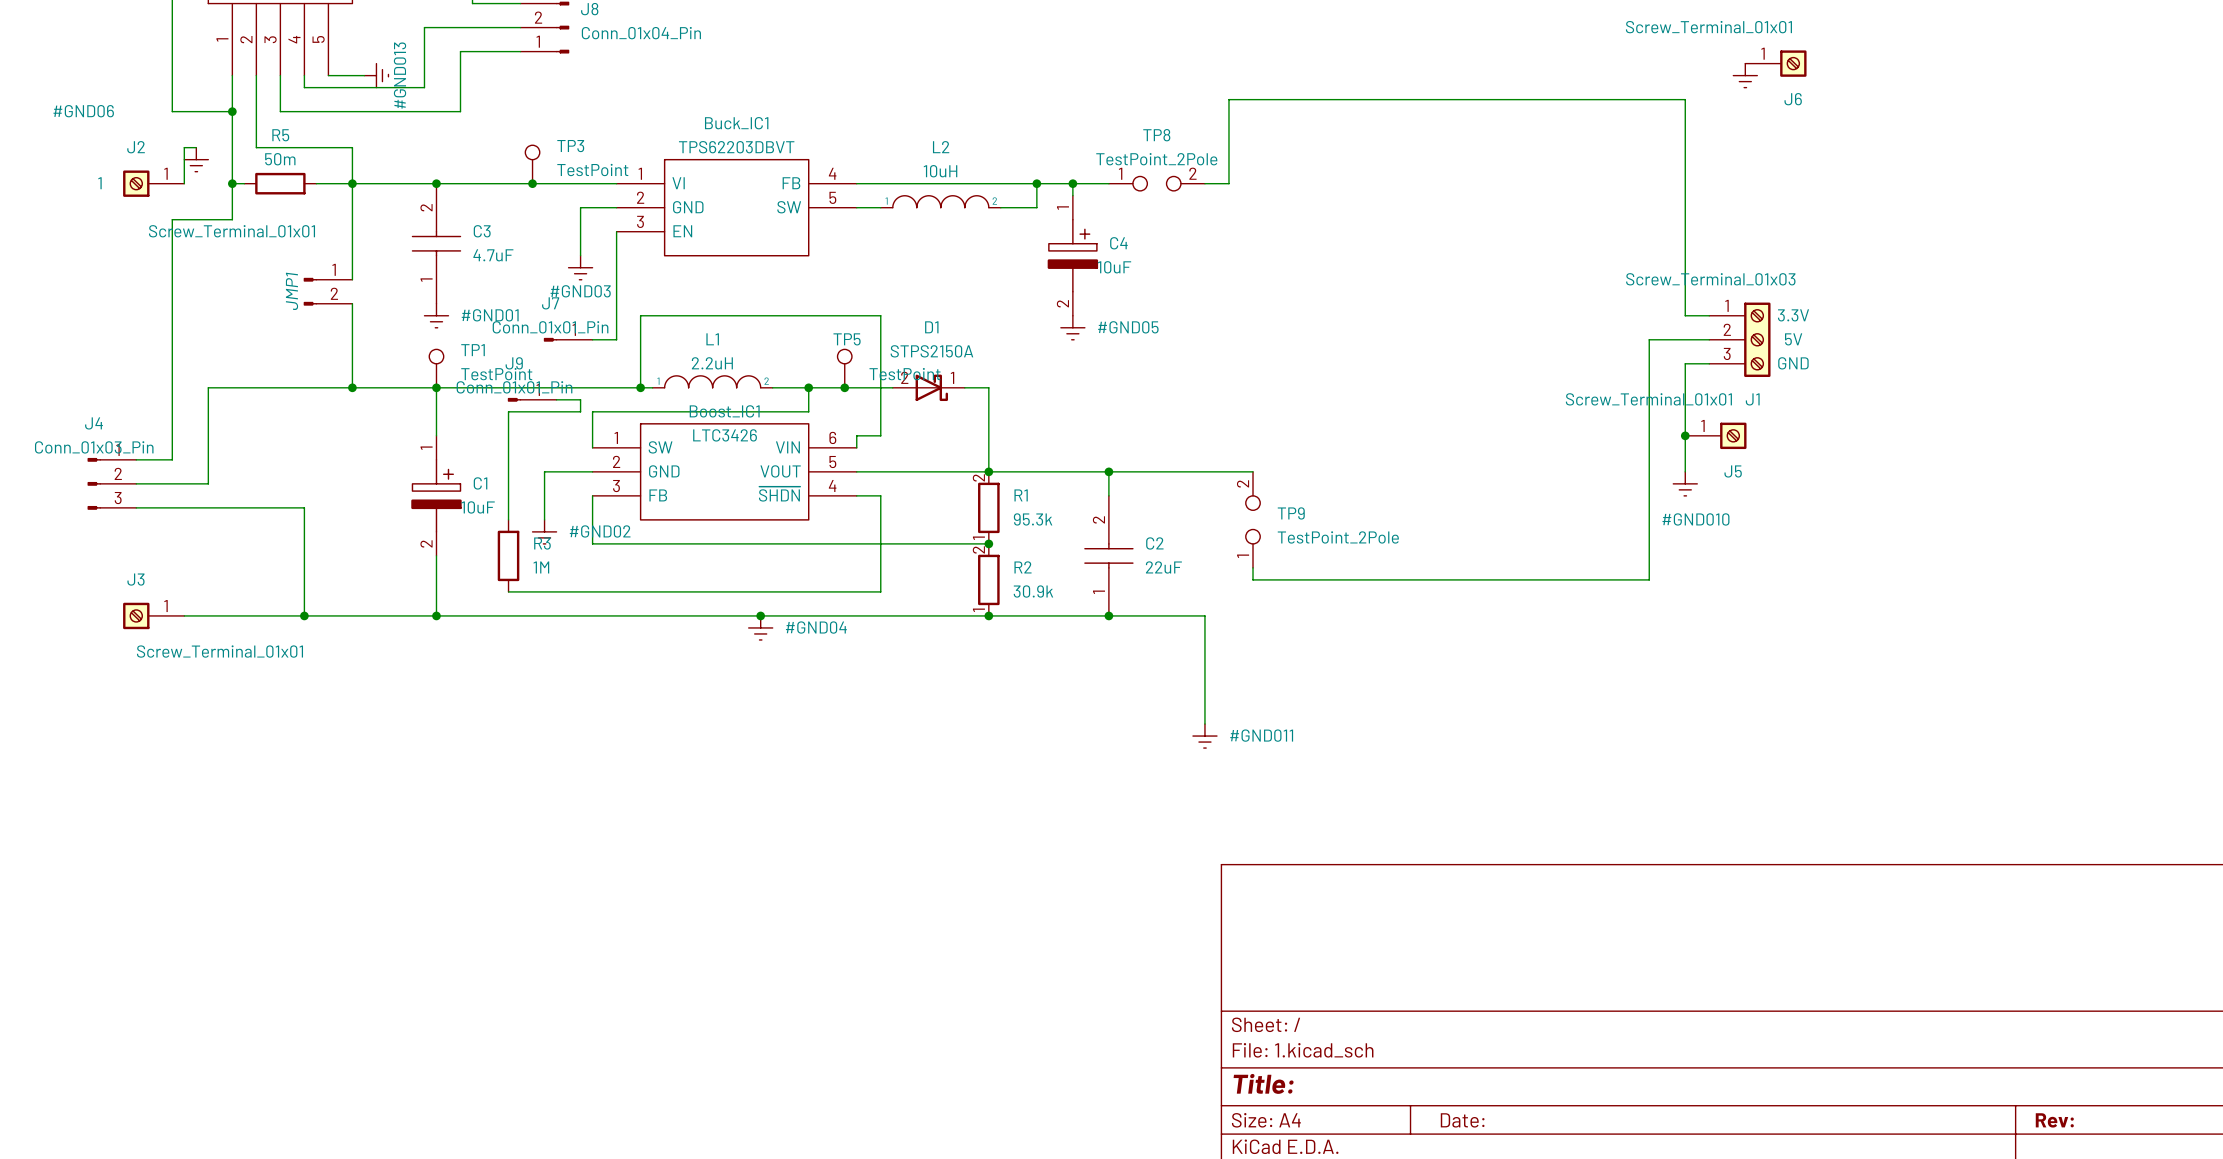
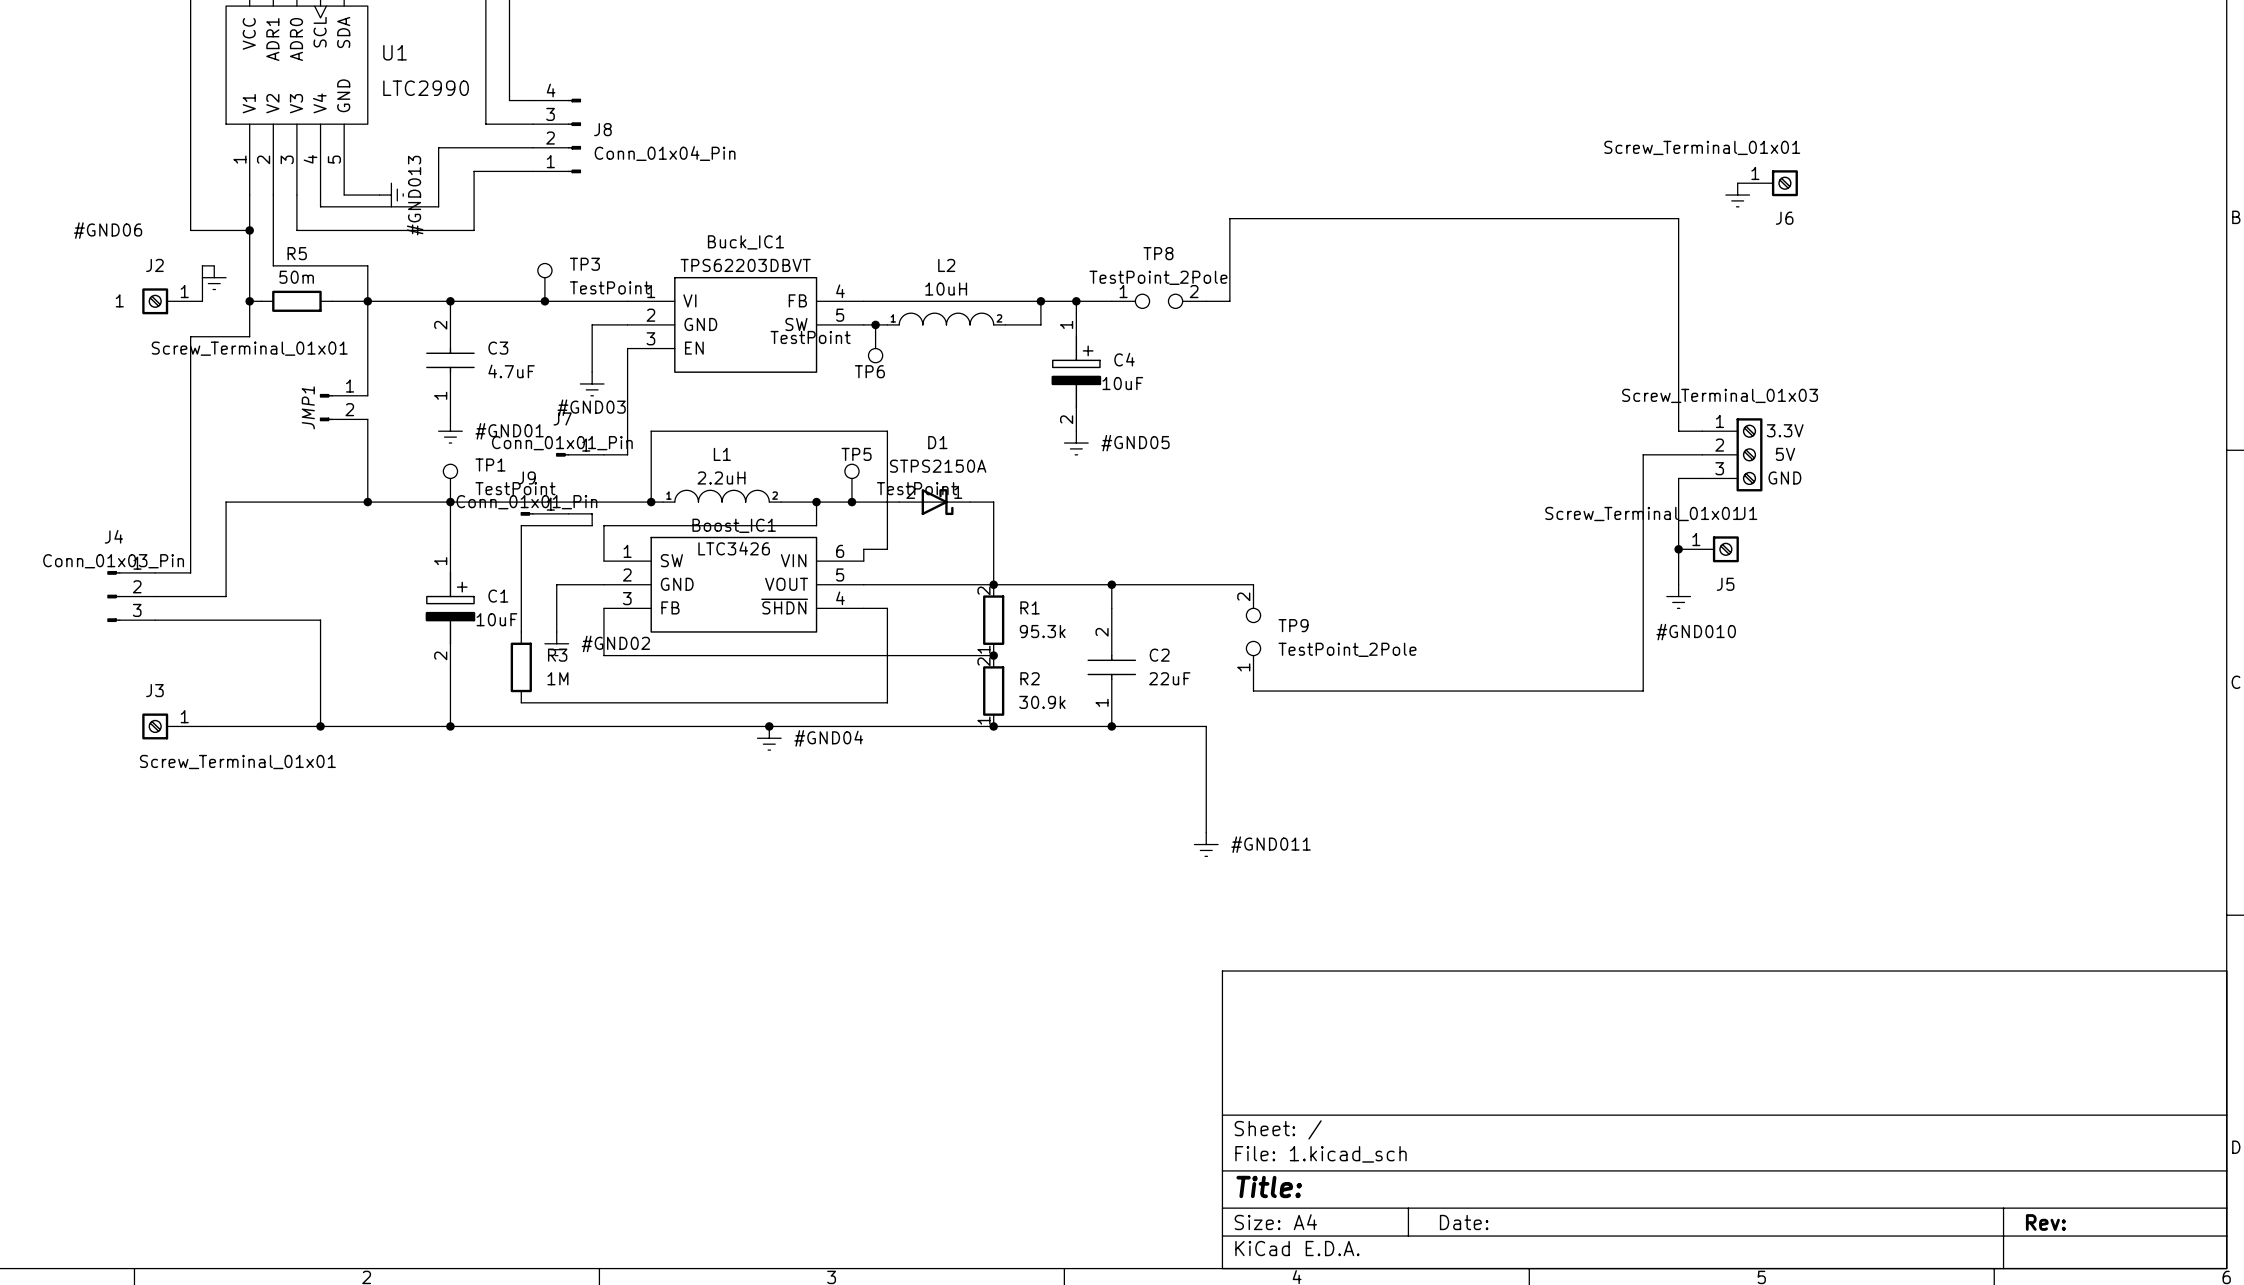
junction: none -> (875, 324)
TP6: none -> TestPoint (875, 343)

